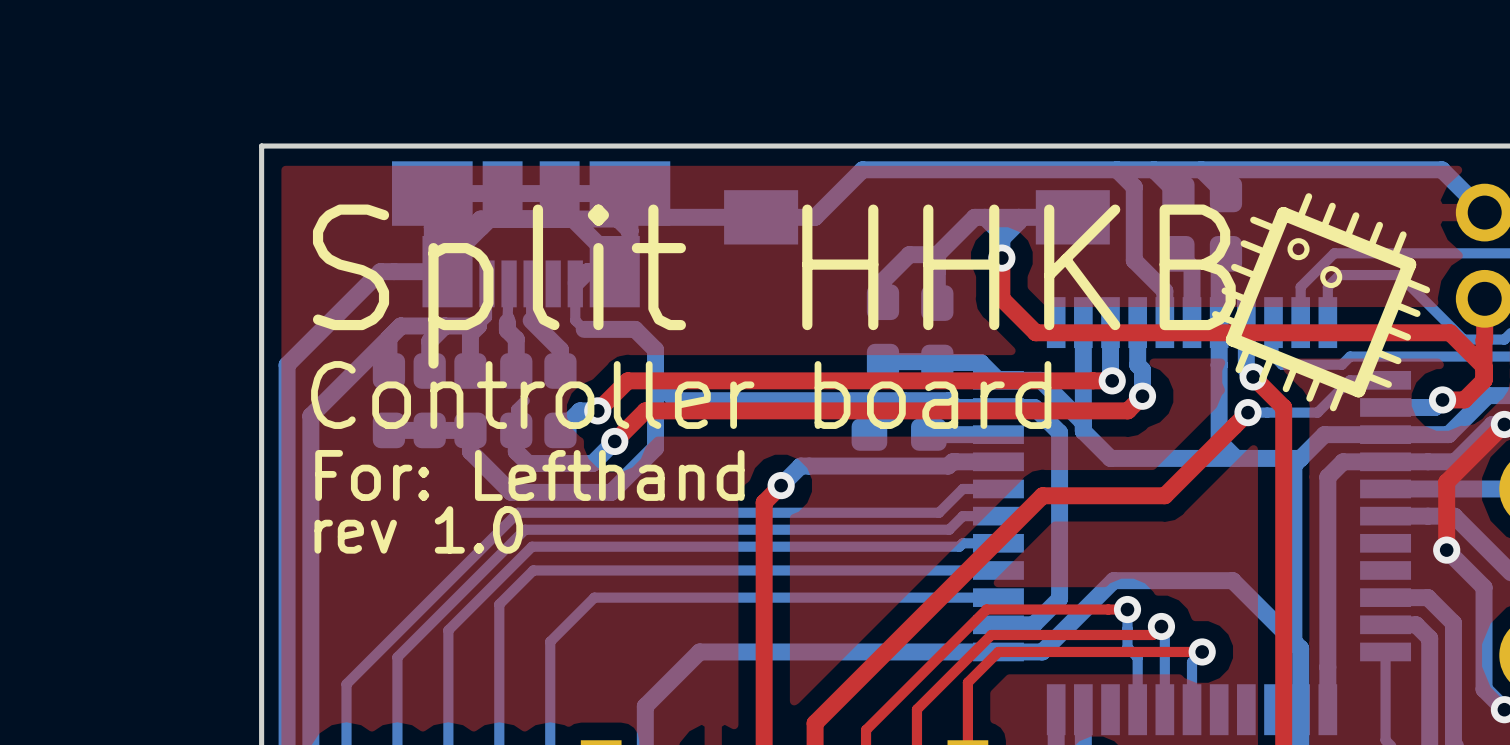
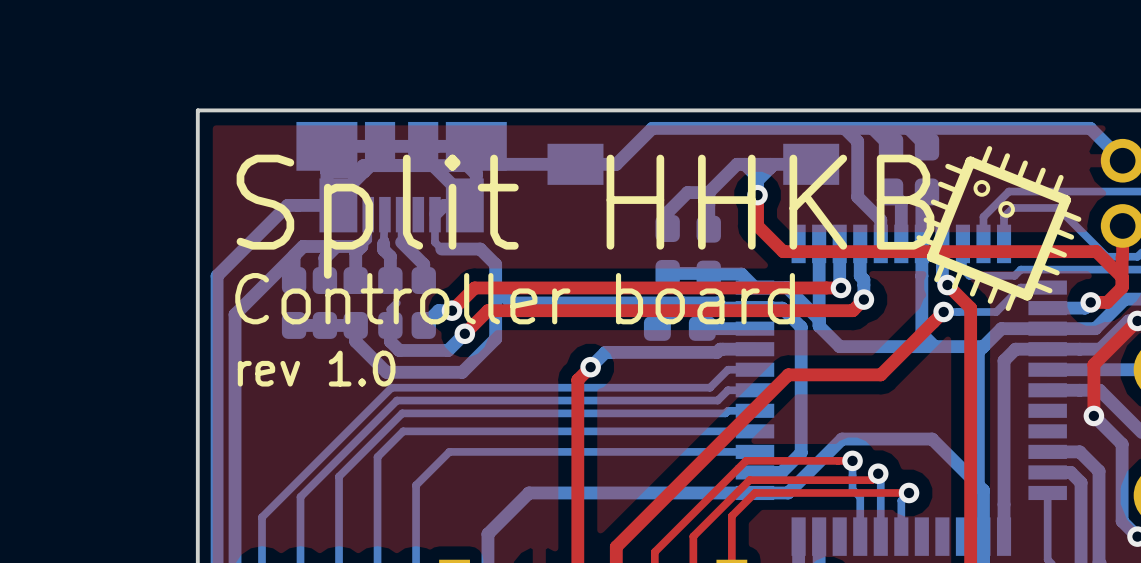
text: For: Lefthand (529, 475) -> none
text position: rev 1.0 (418, 529) -> rev 1.0 (316, 368)

